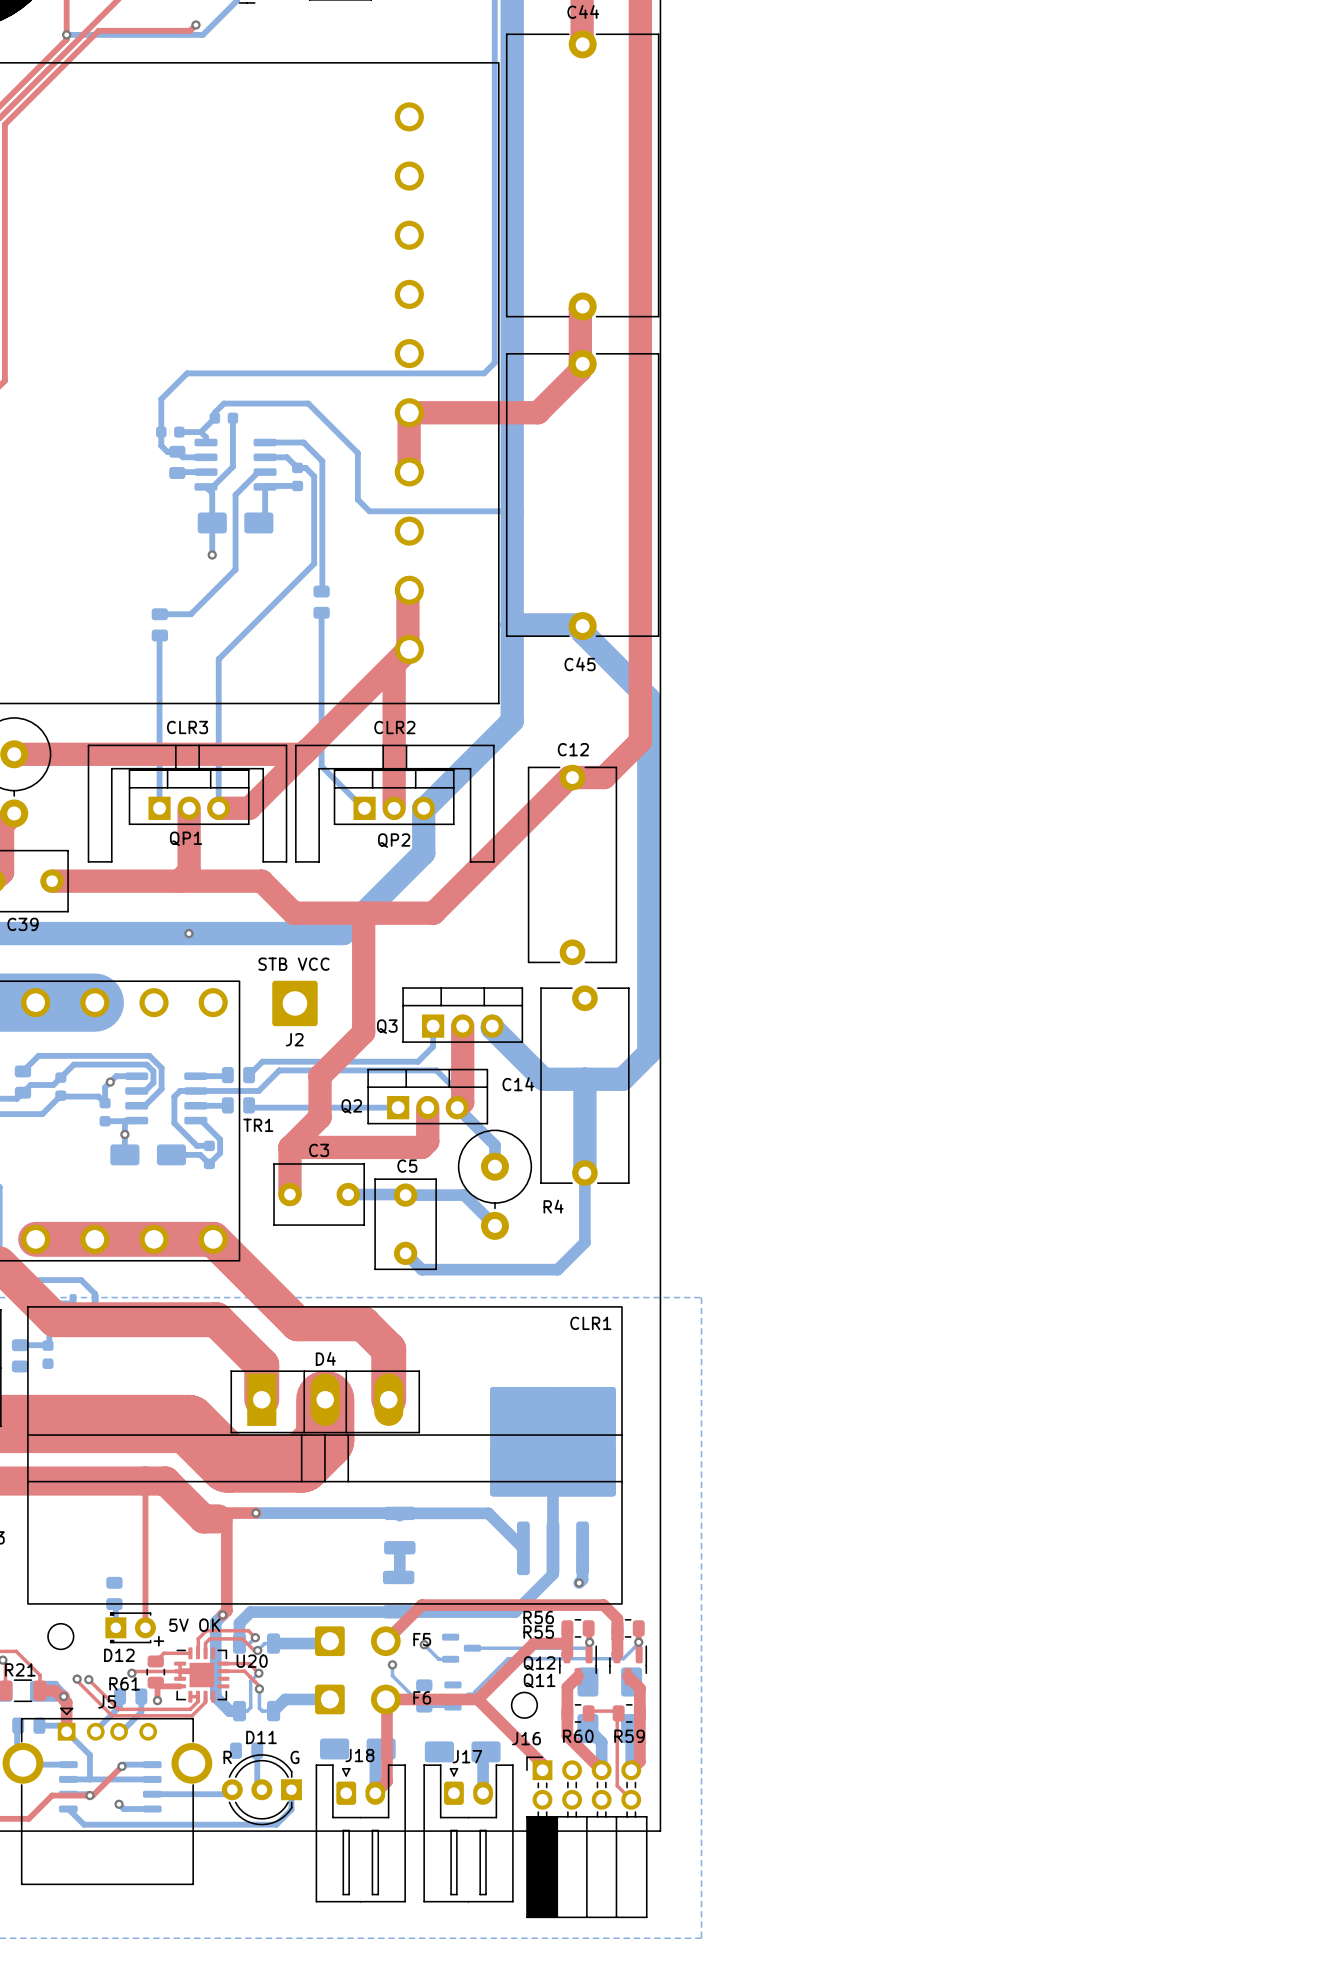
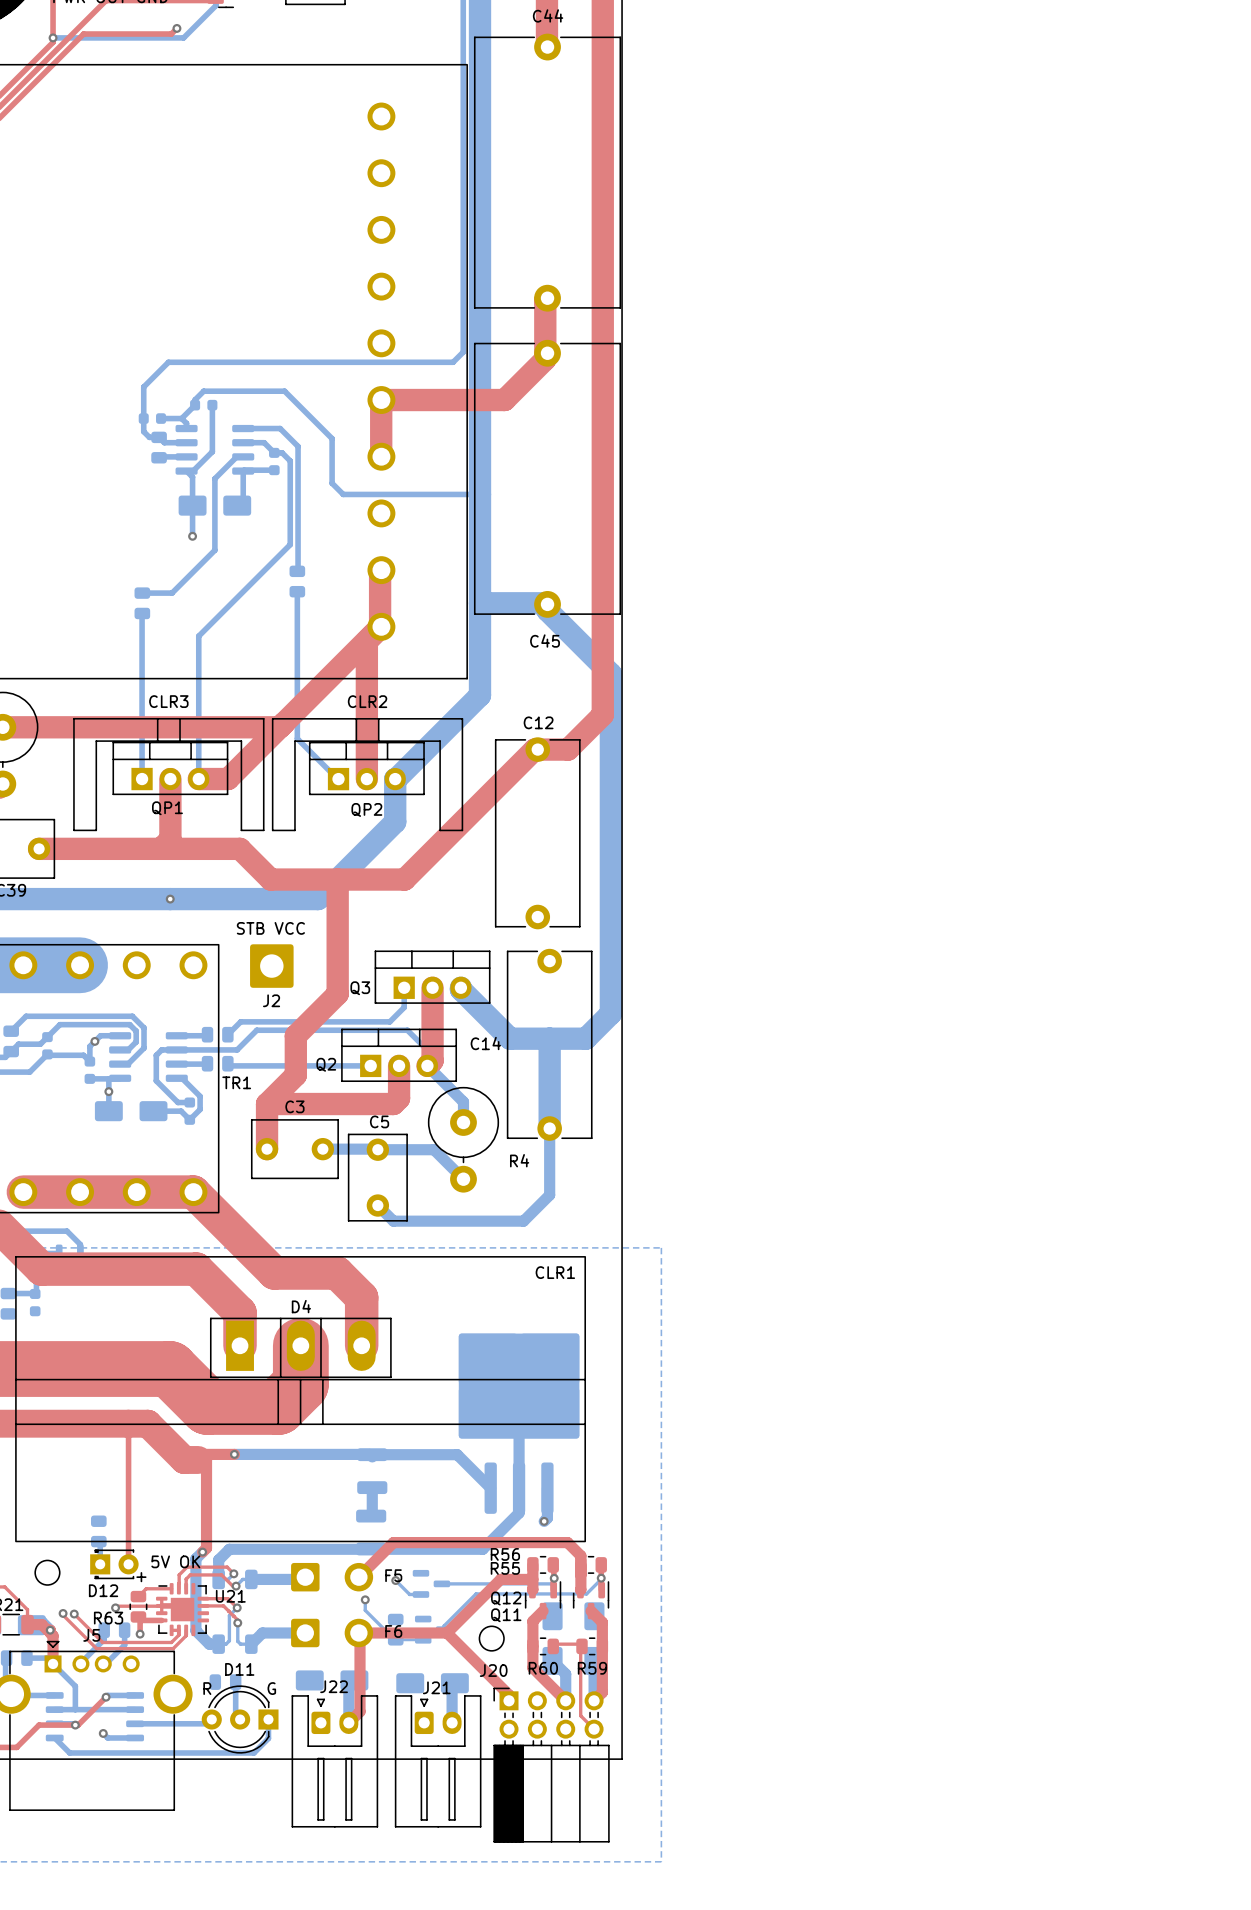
U20 name: U20 (252, 1661) -> U21 (230, 1596)
R61 name: R61 (124, 1683) -> R63 (108, 1618)
J16 name: J16 (526, 1738) -> J20 (493, 1670)
J18 name: J18 (359, 1755) -> J22 (334, 1686)
J17 name: J17 (467, 1756) -> J21 (436, 1687)

